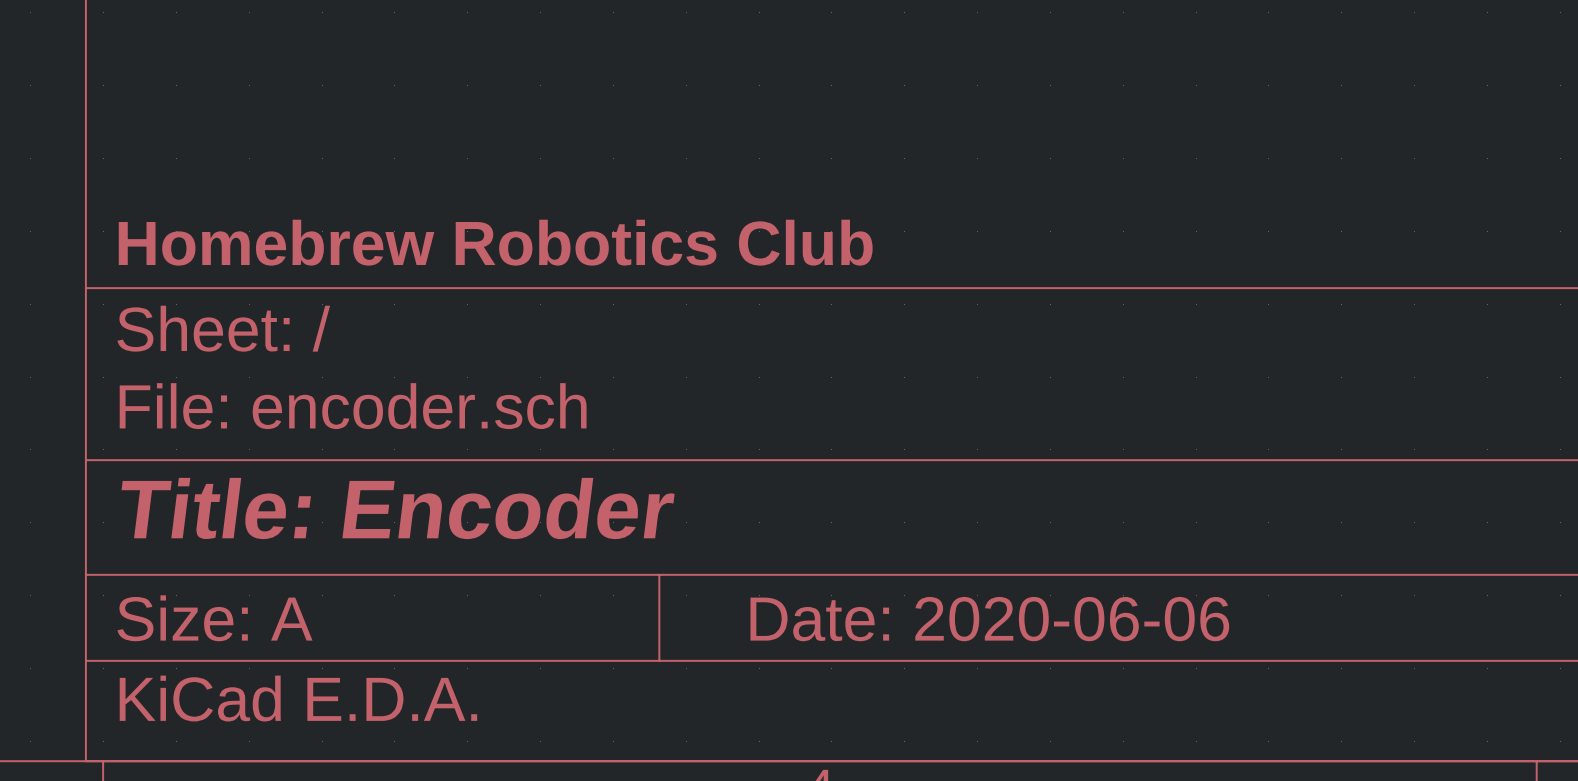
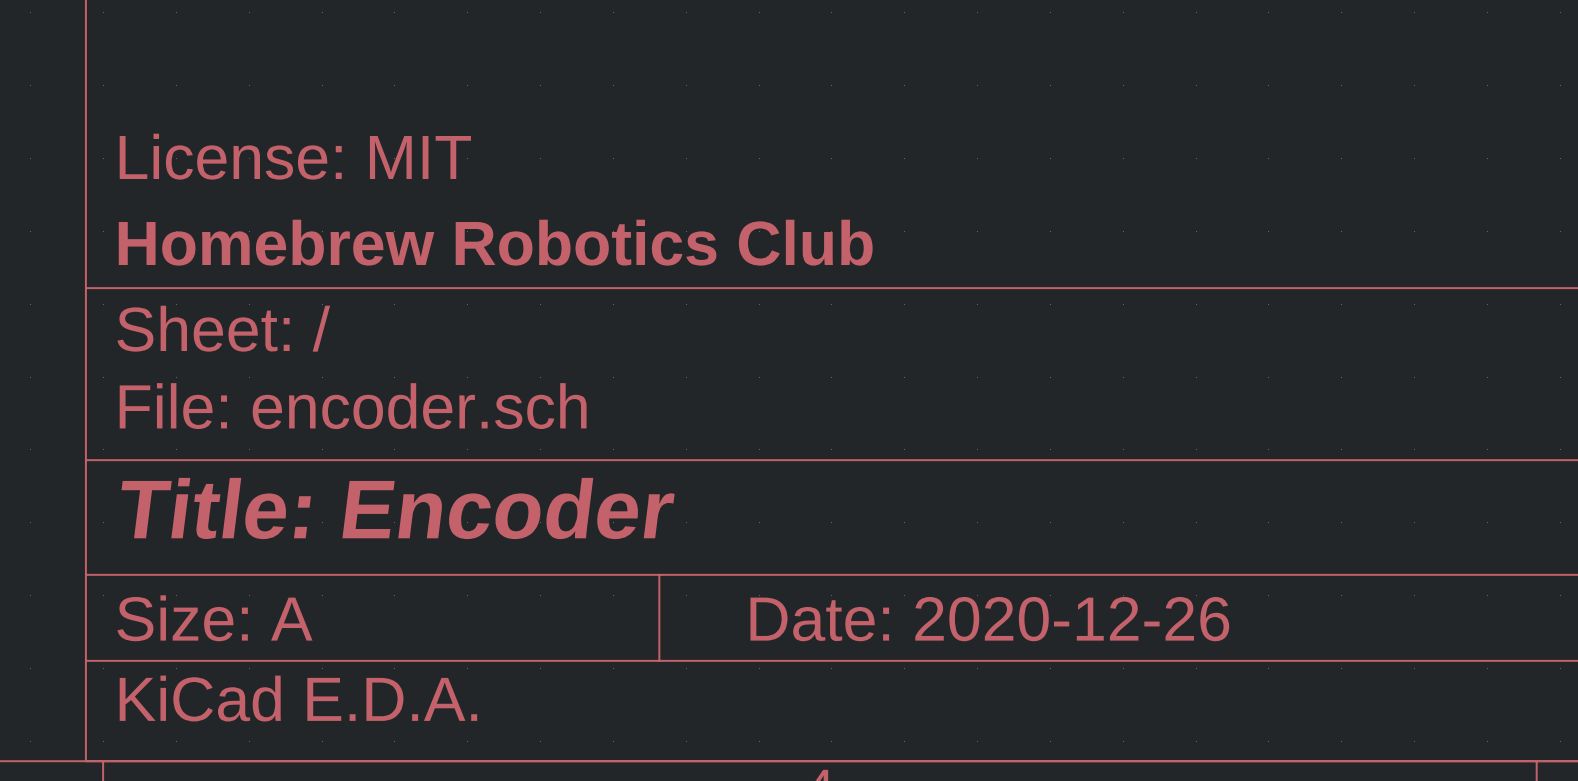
title block: none -> License: MIT (295, 156)
title block: Date: 2020-06-06 (989, 619) -> Date: 2020-12-26 (989, 619)

